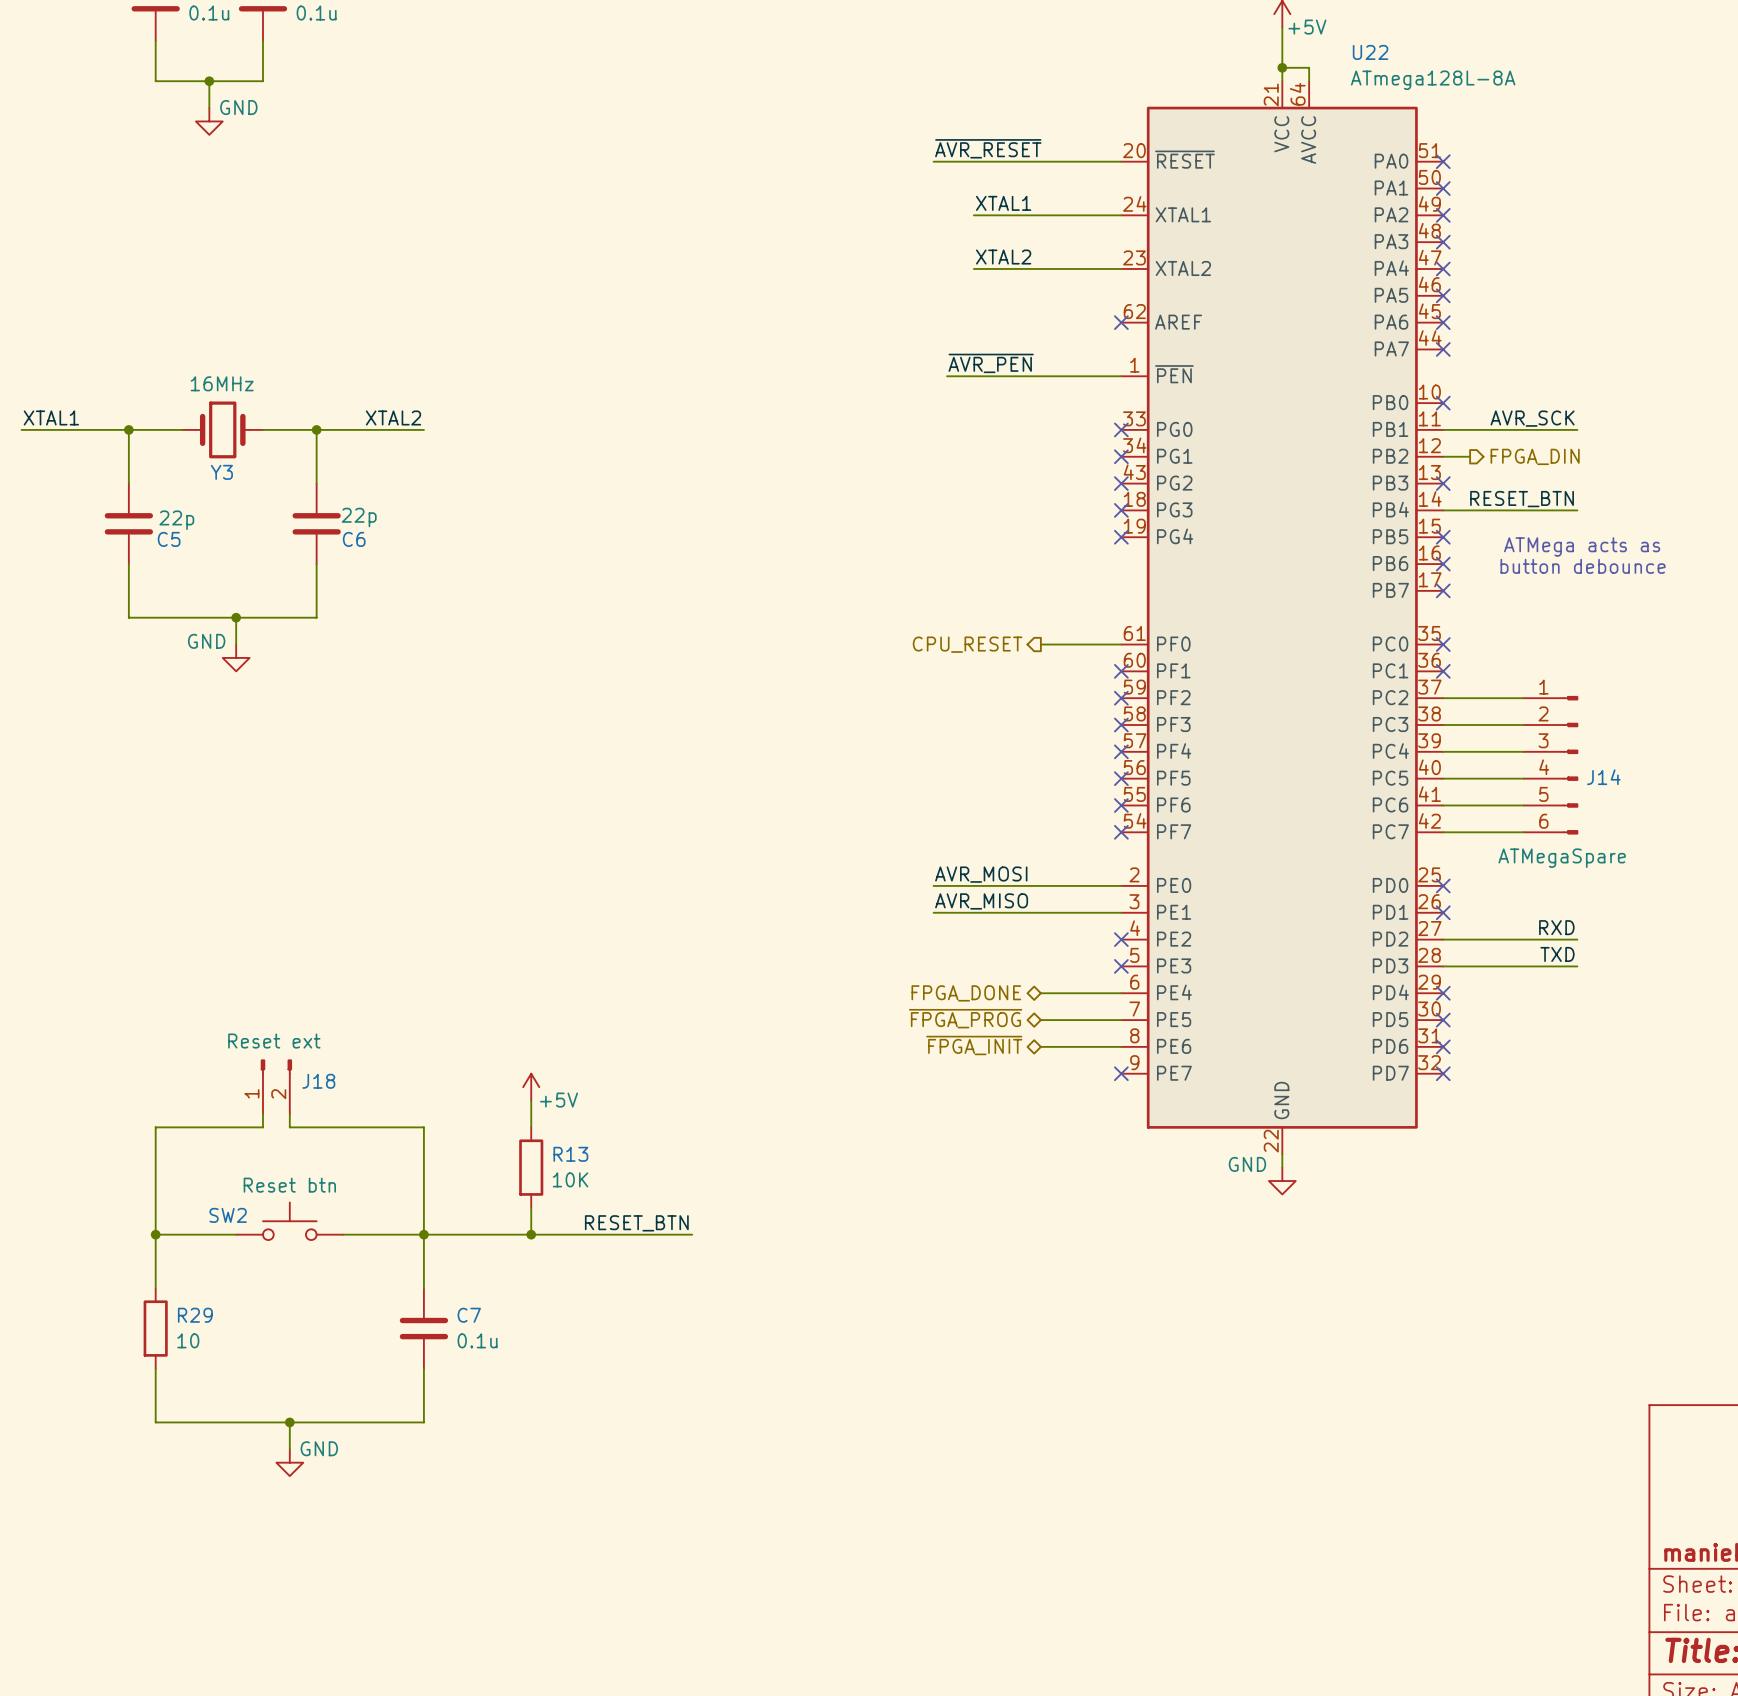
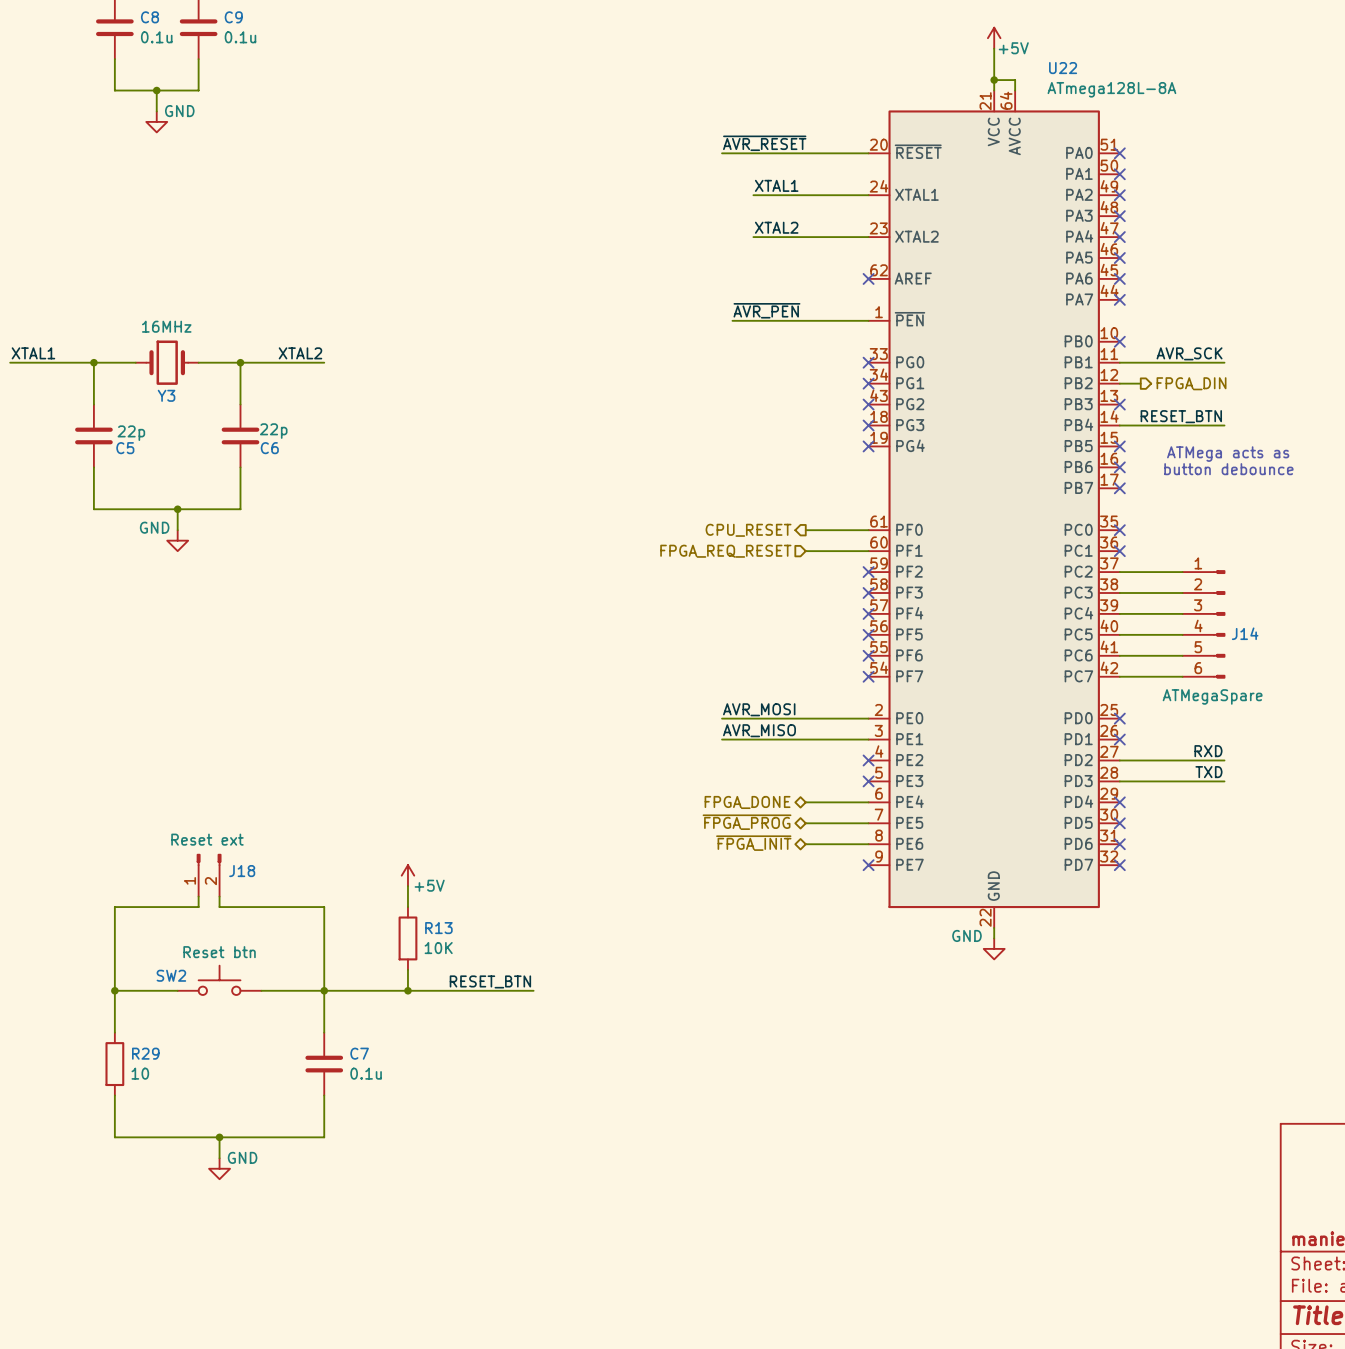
hierarchical label: none -> FPGA_REQ_RESET (725, 551)
wire: none -> (805, 551) (868, 551)
no-connect mark: (1121, 671) -> none

